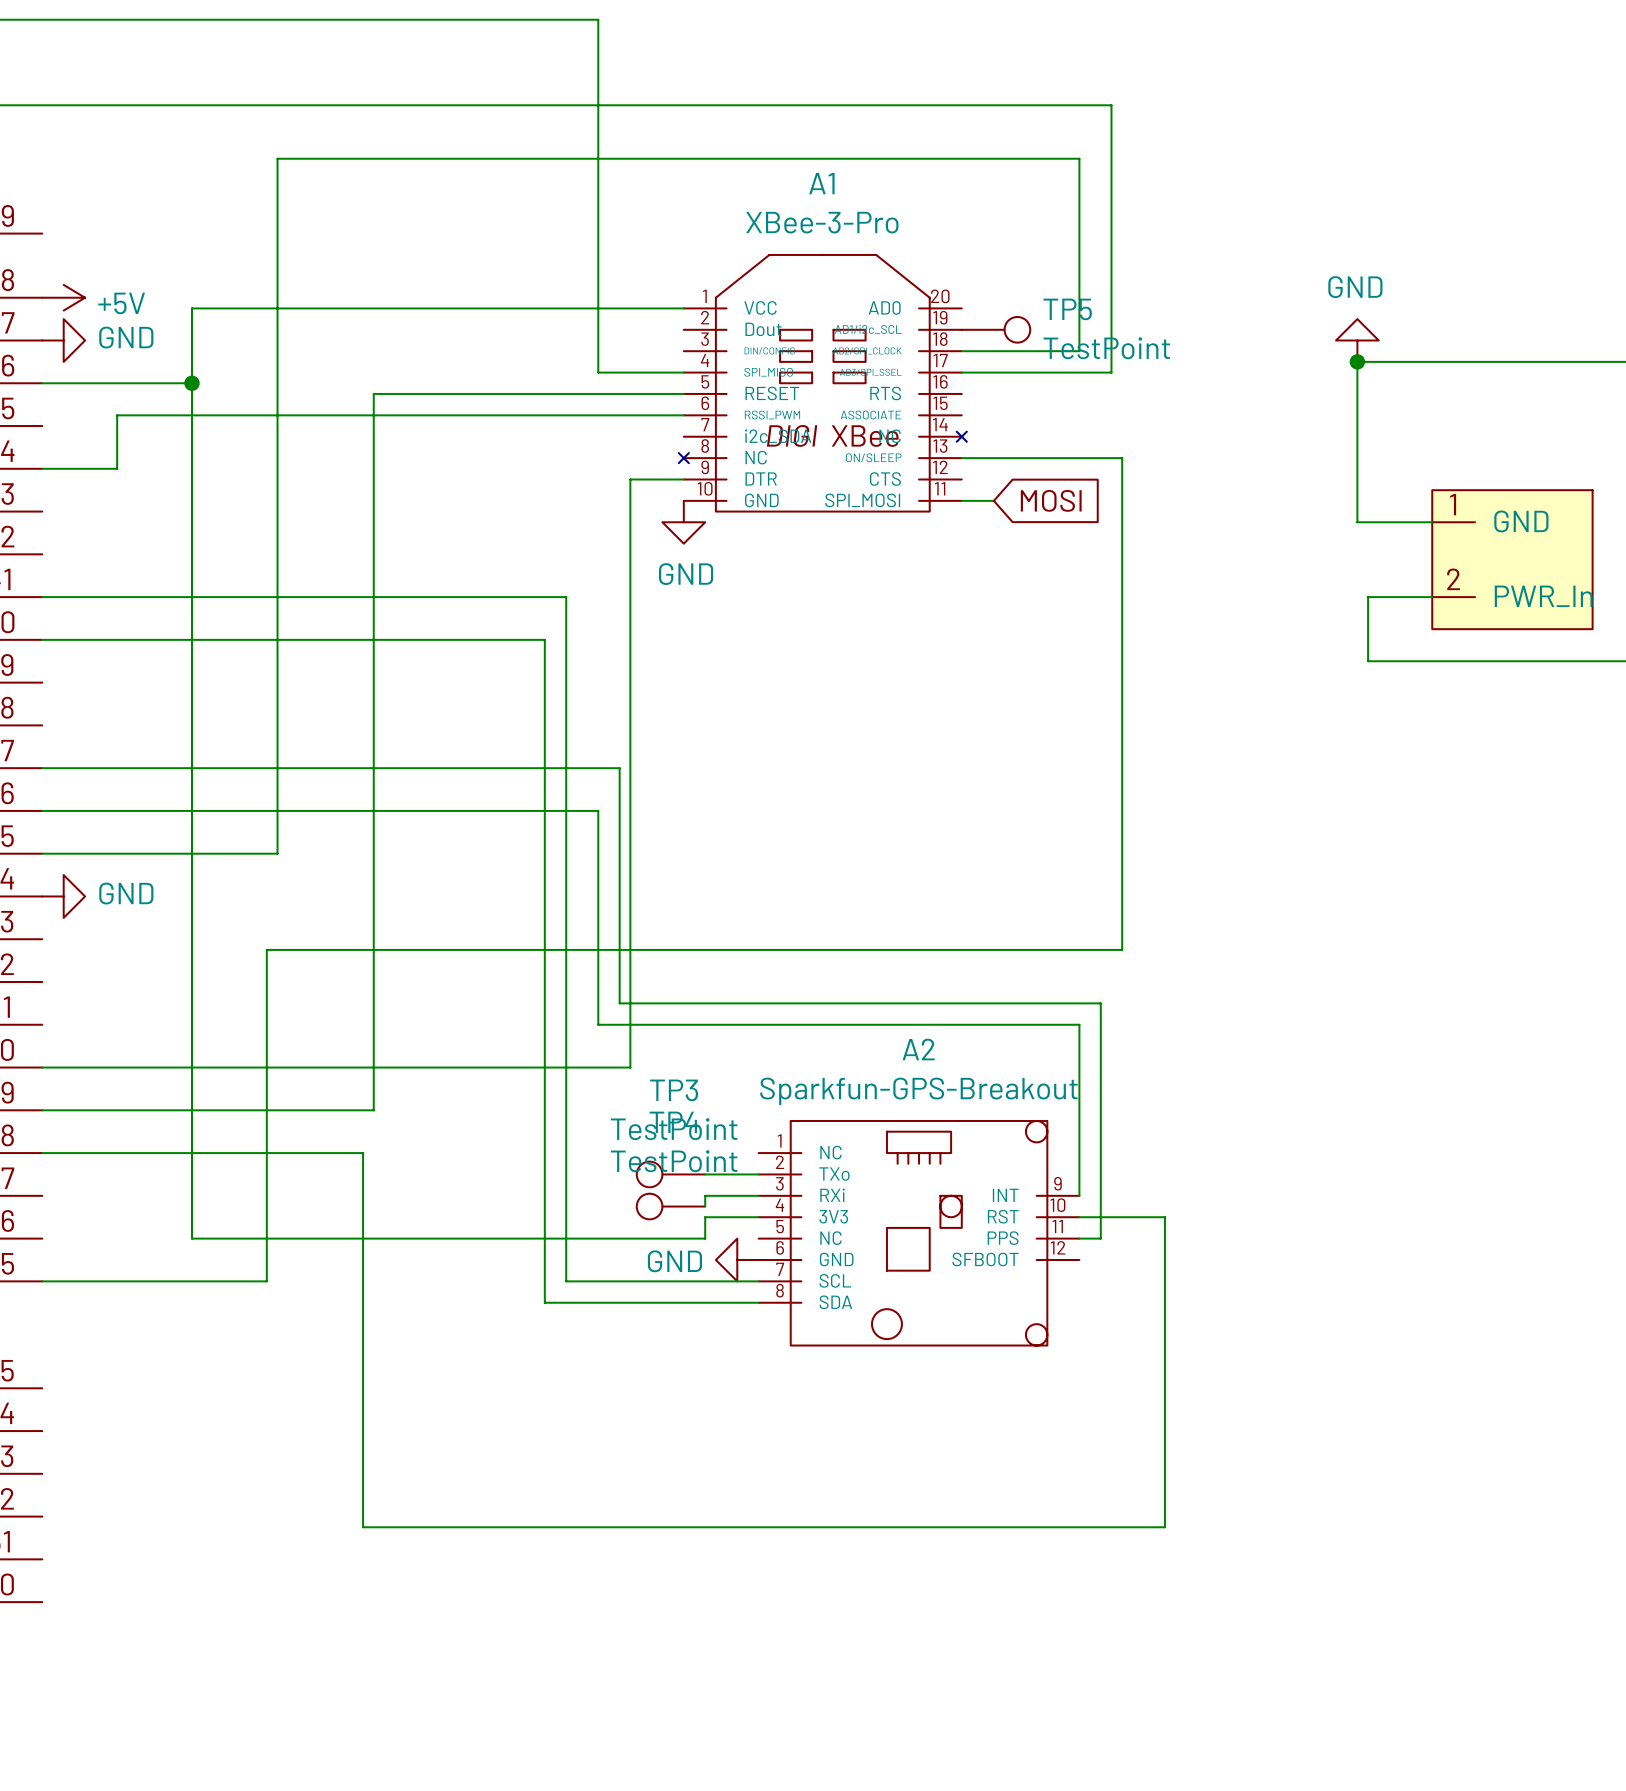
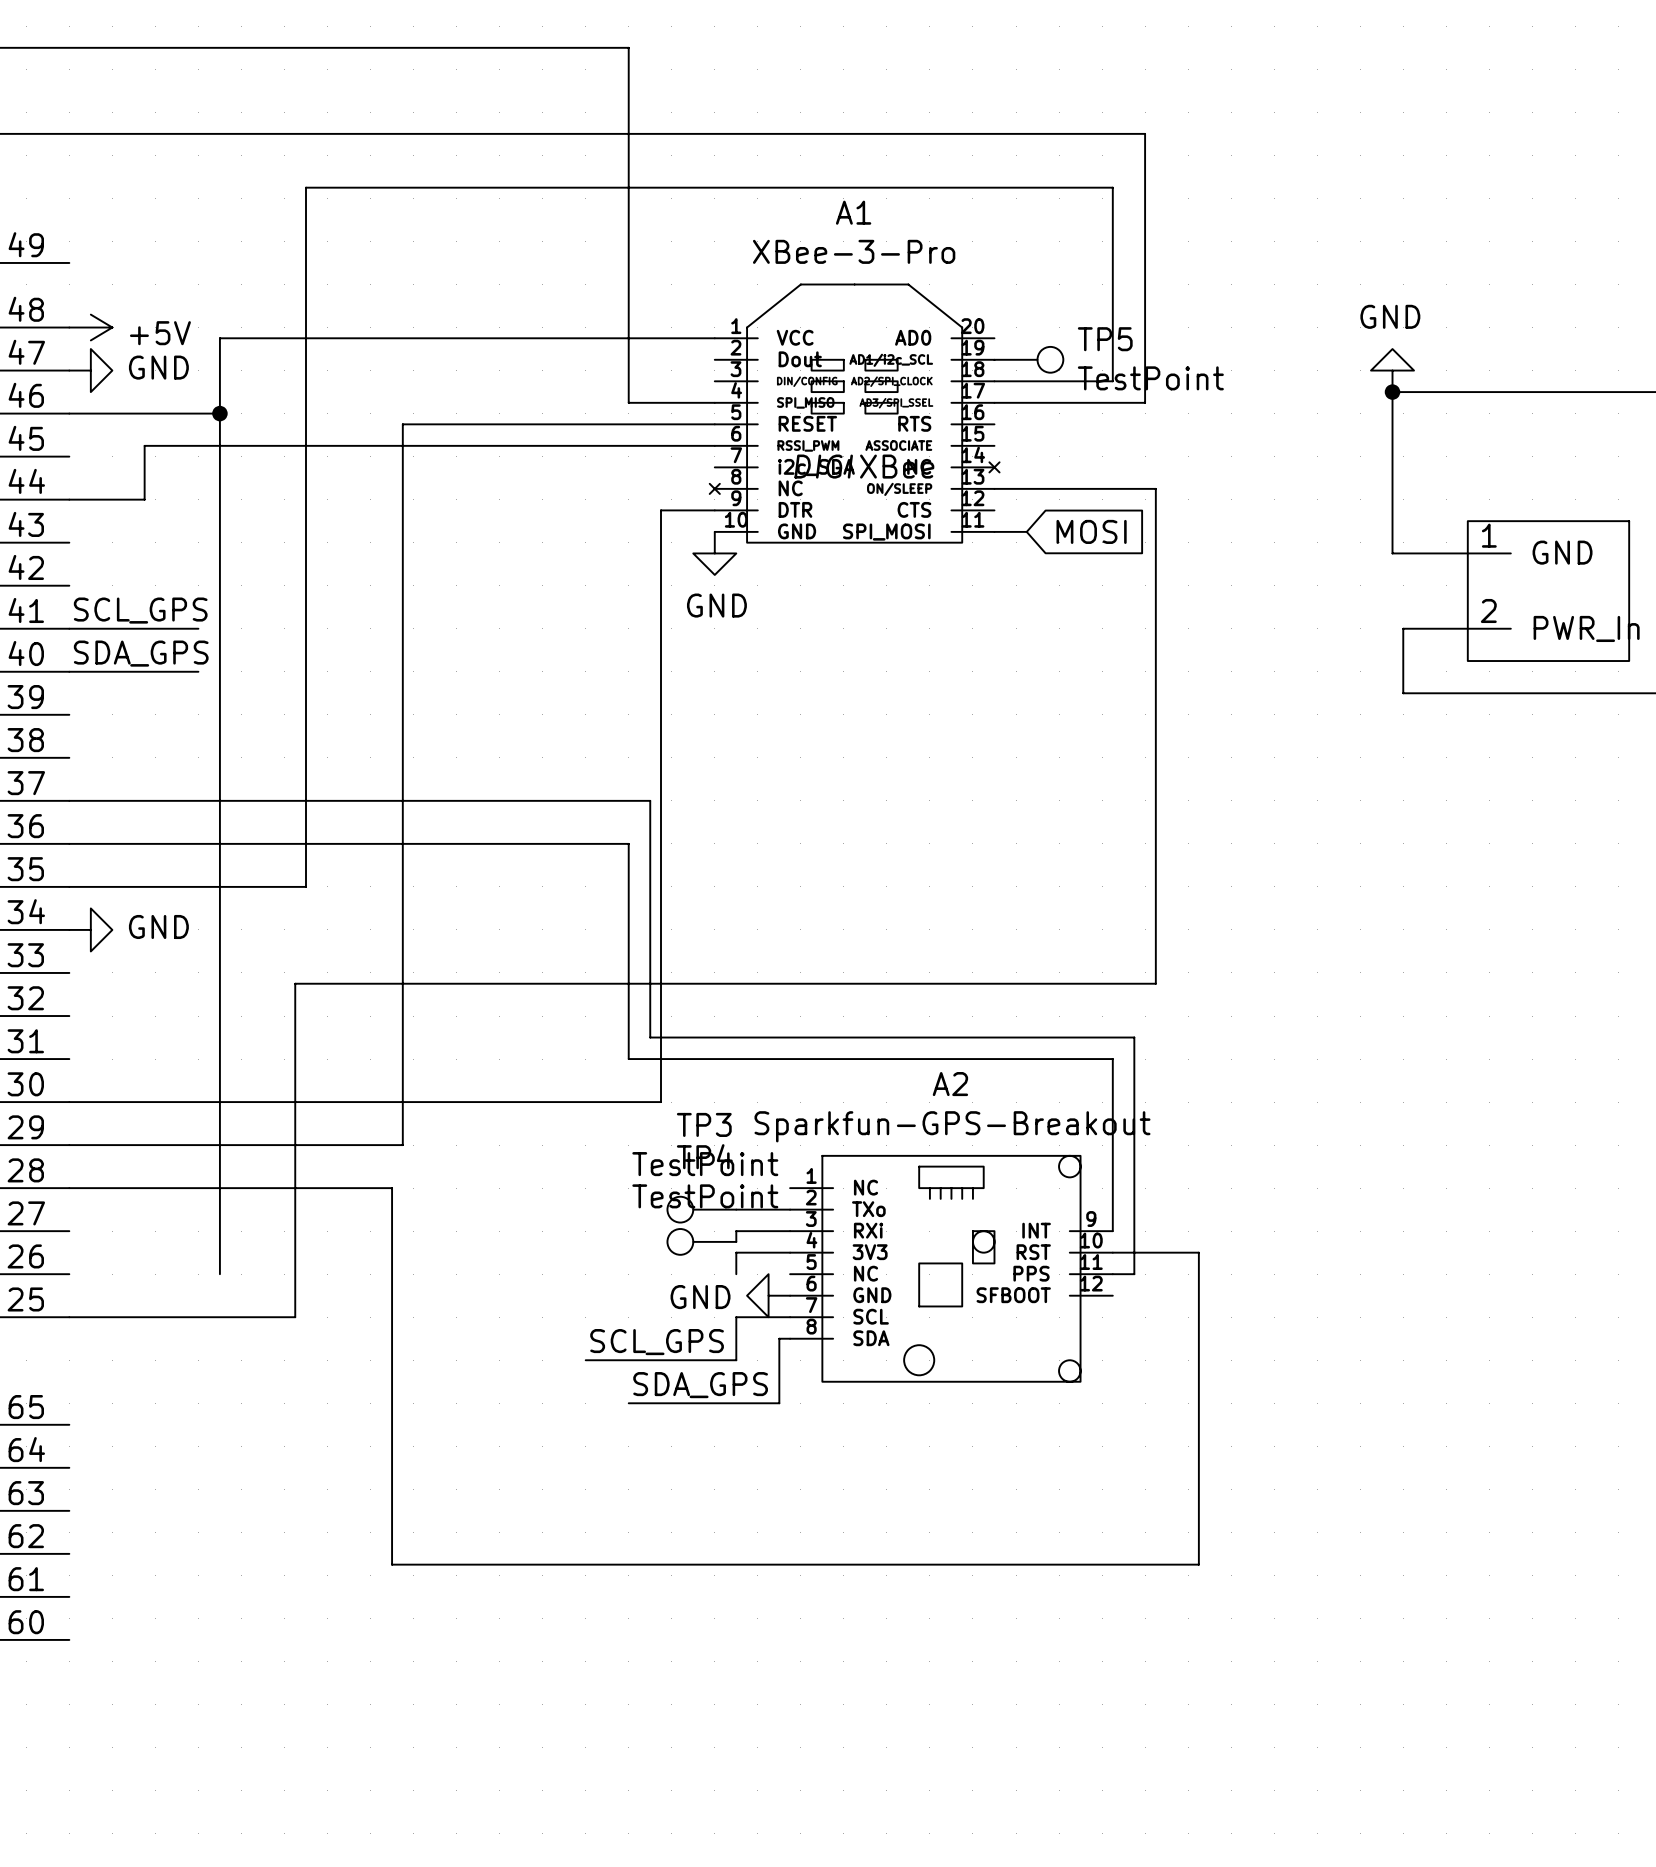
label: none -> SCL_GPS (140, 610)
wire: (170, 597) (566, 597) (566, 1281) (705, 1281) -> (585, 1360) (736, 1360) (736, 1317)
label: none -> SDA_GPS (141, 653)
wire: (170, 639) (544, 639) (544, 1302) (747, 1302) -> (628, 1403) (779, 1403) (779, 1338)
wire: (191, 1238) (705, 1238) -> none
label: none -> SCL_GPS (657, 1342)
label: none -> SDA_GPS (700, 1385)

